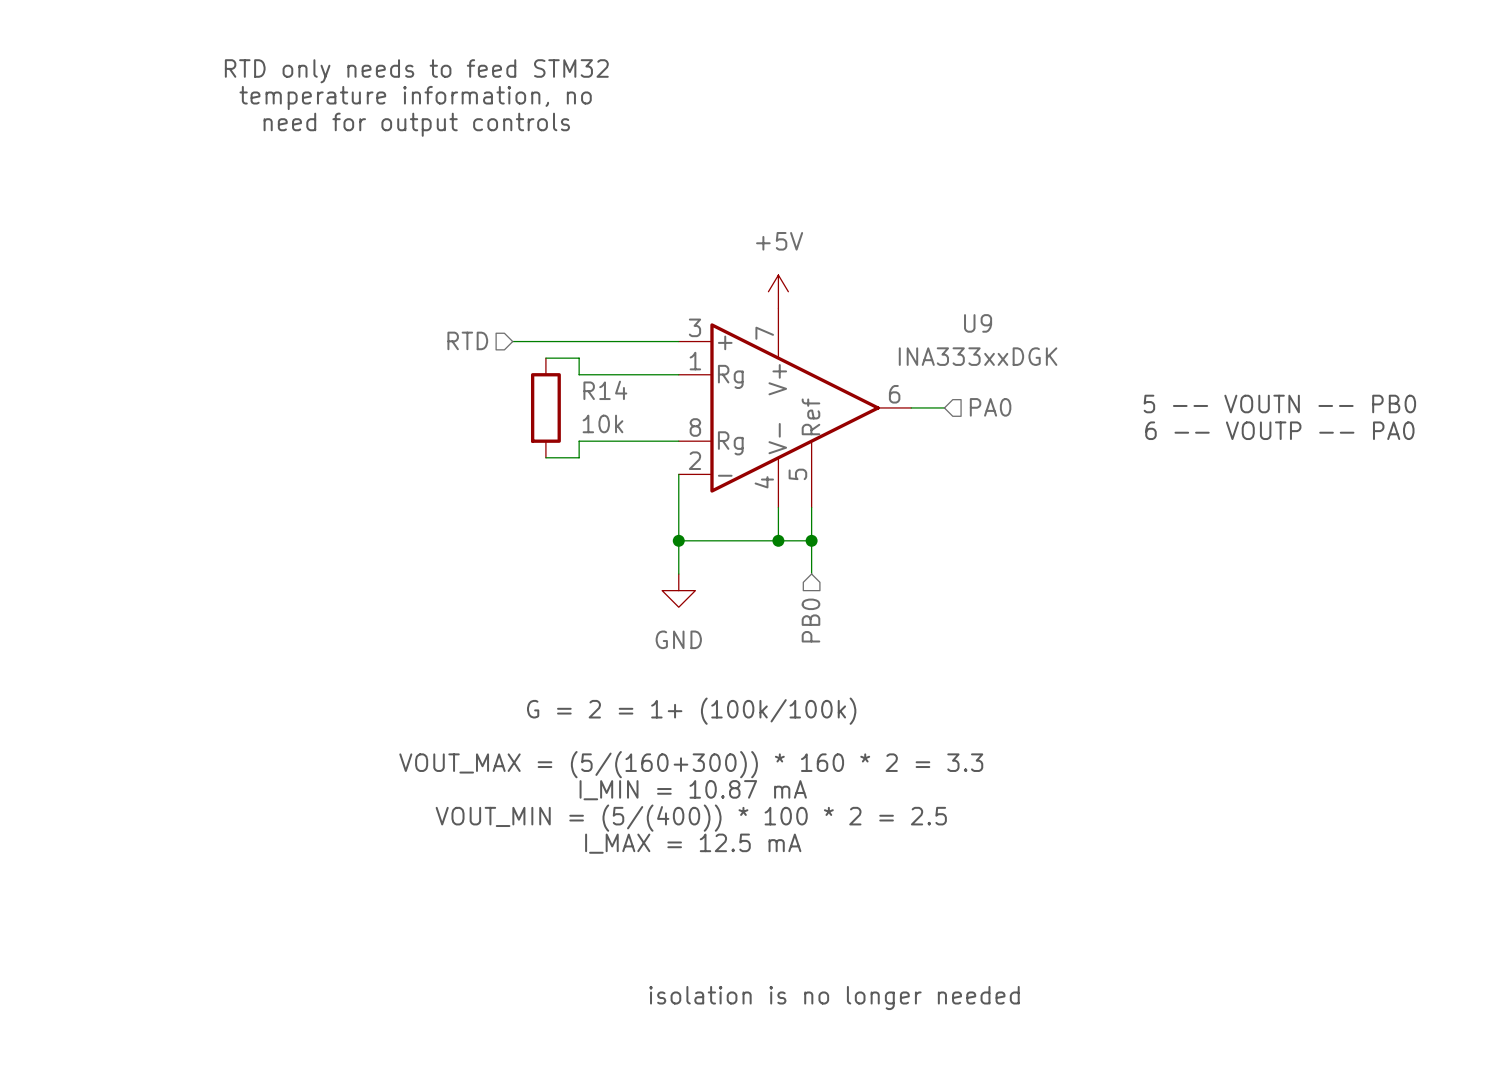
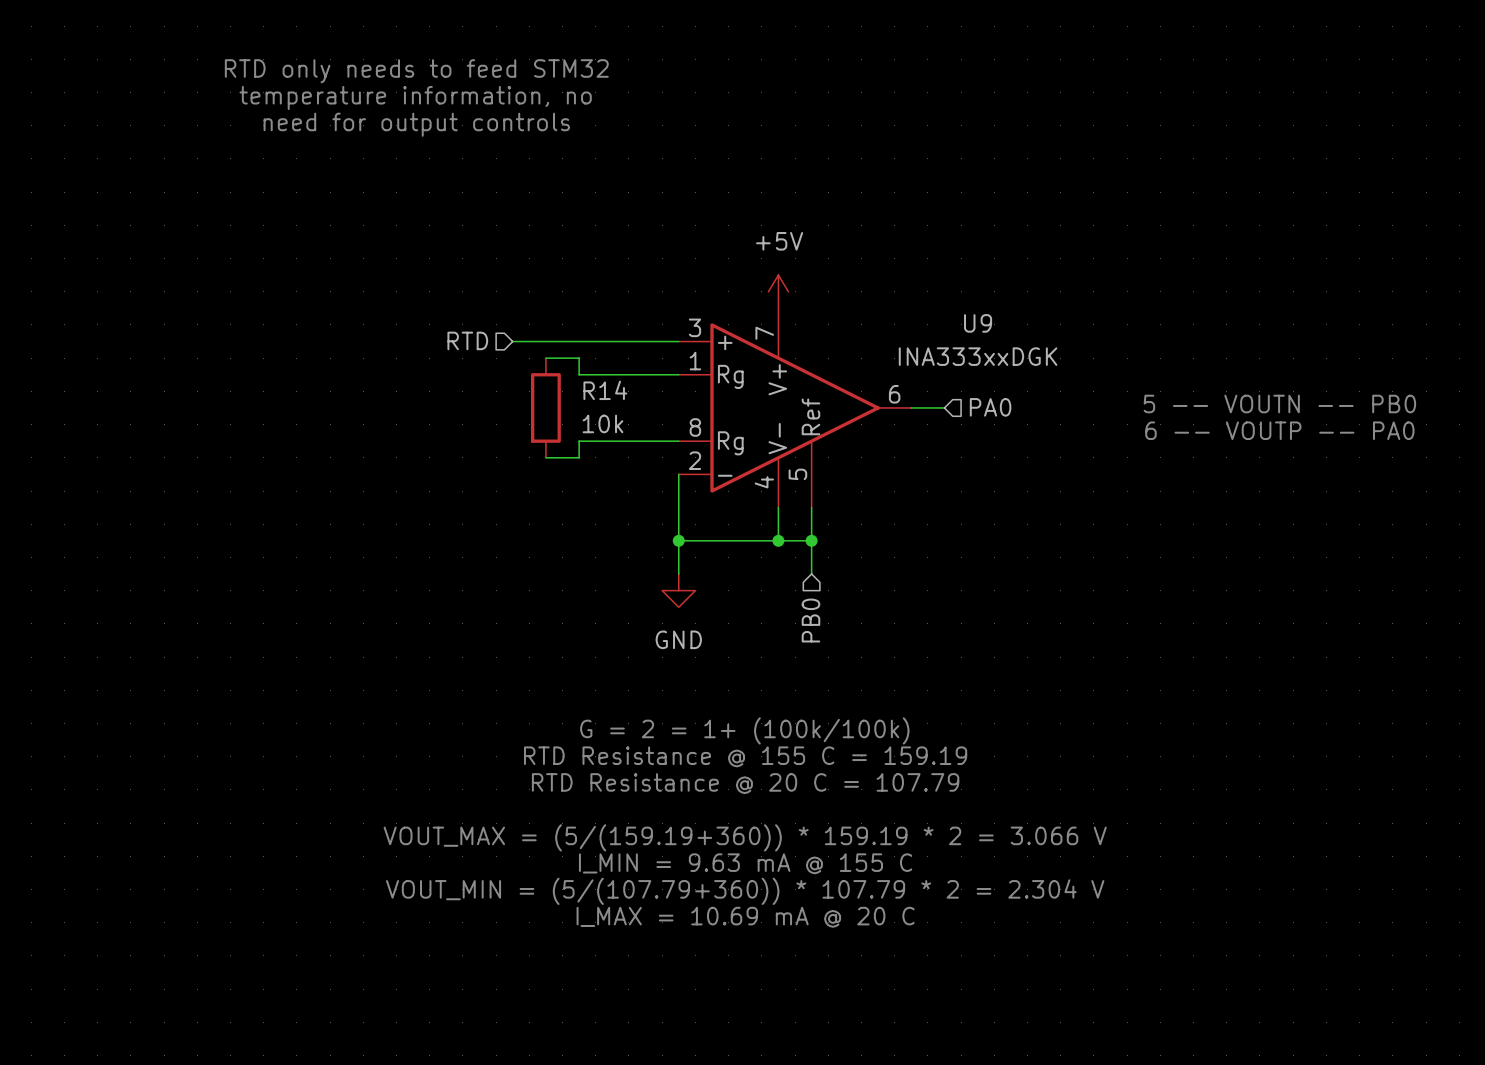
text position: G = 2 = 1+ (100k/100k) (691, 711) -> G = 2 = 1+ (100k/100k) (744, 730)
text: none -> RTD Resistance @ 155 C = 159.19 (745, 756)
text: VOUT_MAX = (5/(160+300)) * 160 * 2 = 3.3 (691, 764) -> none
text: none -> RTD Resistance @ 20 C = 107.79 (745, 783)
text: I_MIN = 10.87 mA (693, 790) -> none
text: VOUT_MIN = (5/(400)) * 100 * 2 = 2.5 (691, 818) -> VOUT_MAX = (5/(159.19+360)) * 159.19 * 2 = 3.066 V (745, 837)
text: I_MAX = 12.5 mA (693, 843) -> none
text: none -> I_MIN = 9.63 mA @ 155 C (745, 863)
text: none -> VOUT_MIN = (5/(107.79+360)) * 107.79 * 2 = 2.304 V (745, 891)
text: none -> I_MAX = 10.69 mA @ 20 C (745, 917)
text: isolation is no longer needed (834, 997) -> none

